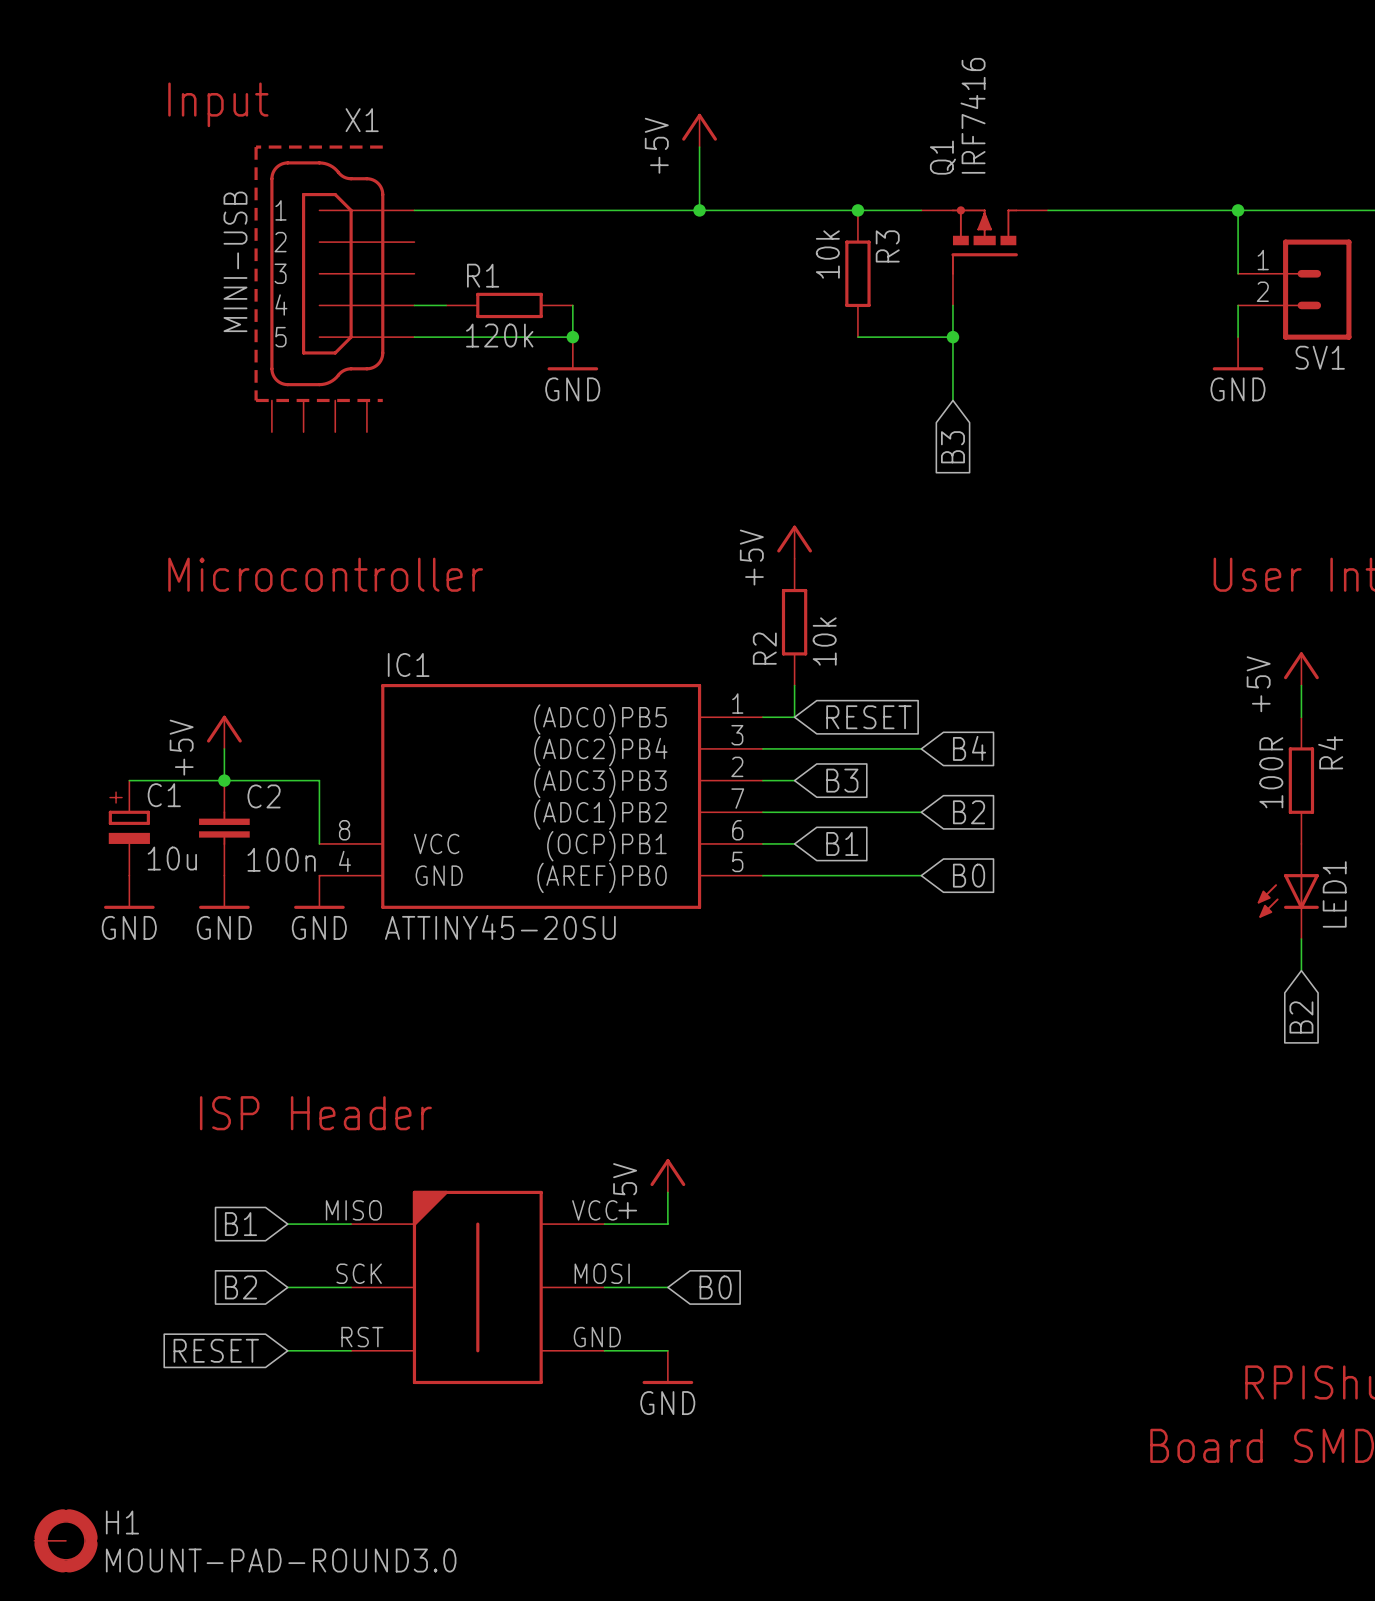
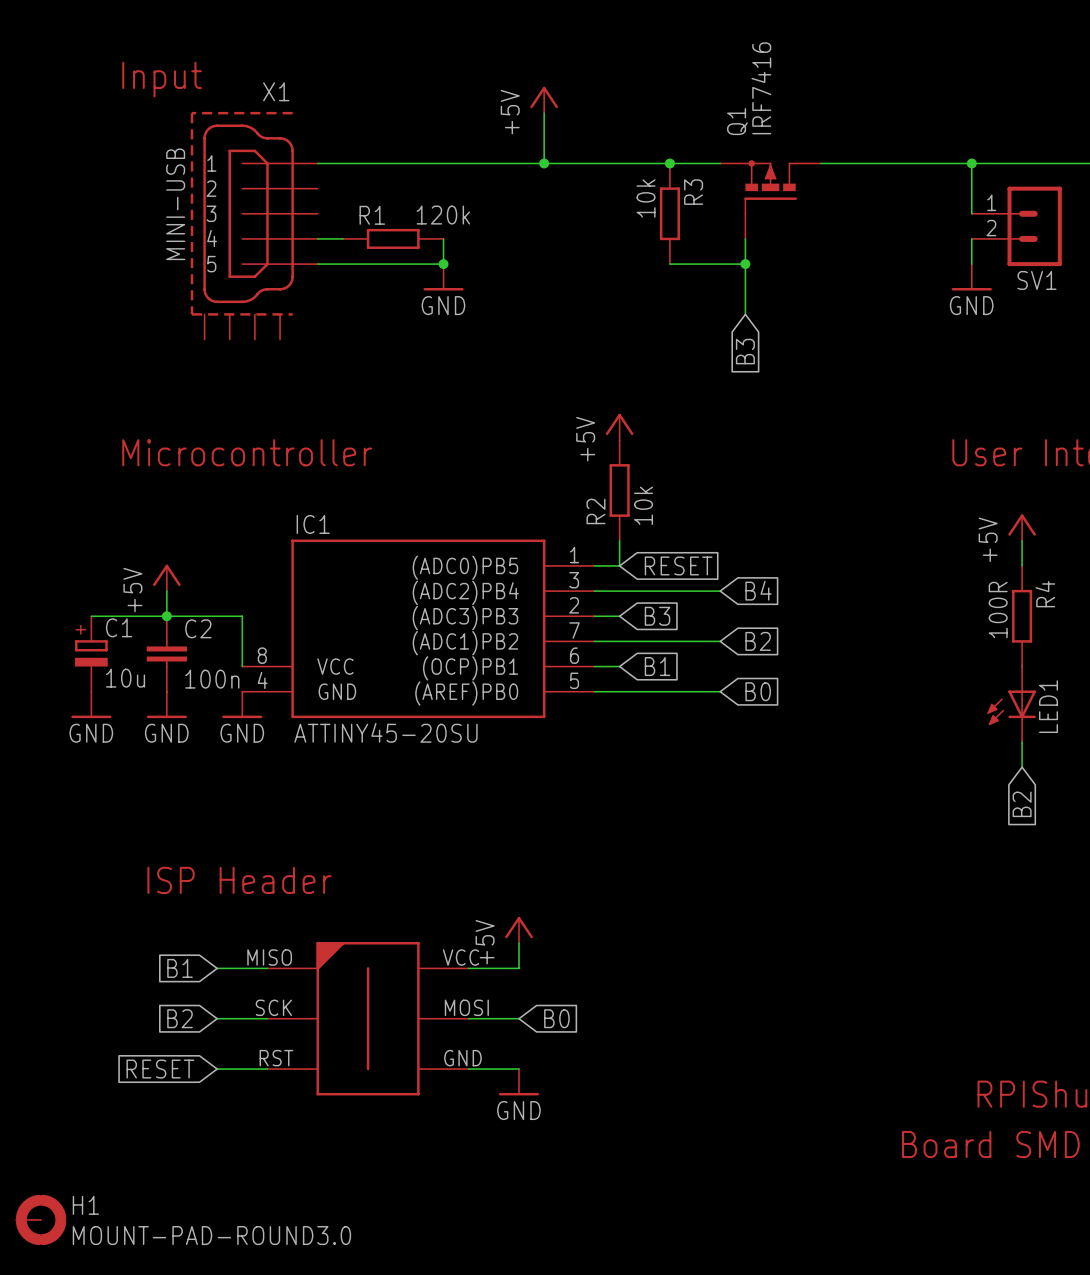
R1 value position: 120k (499, 335) -> 120k (443, 215)

